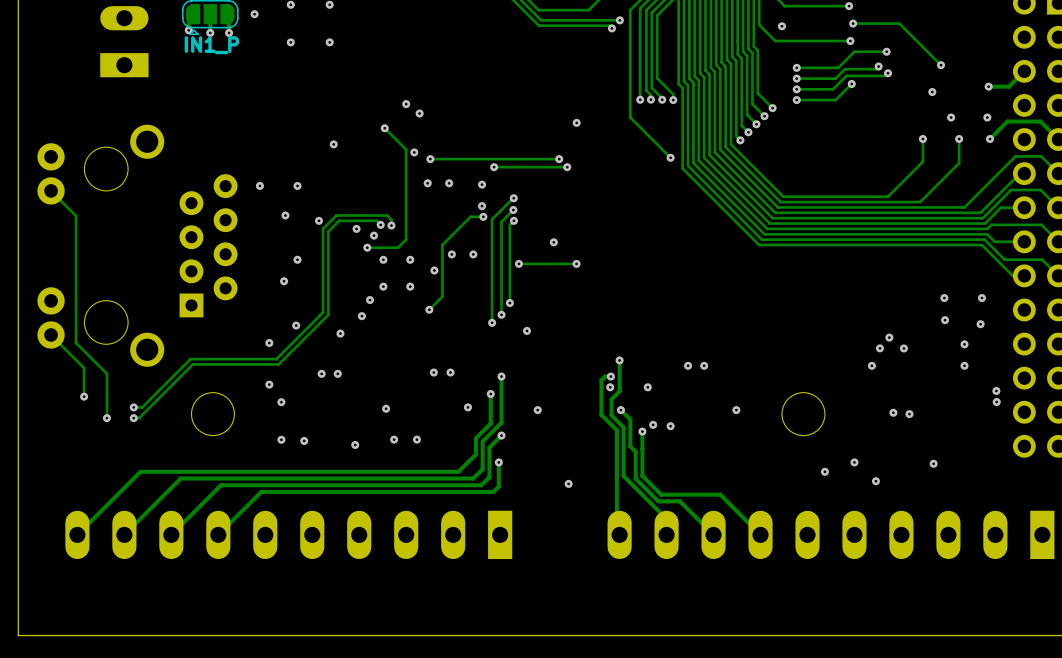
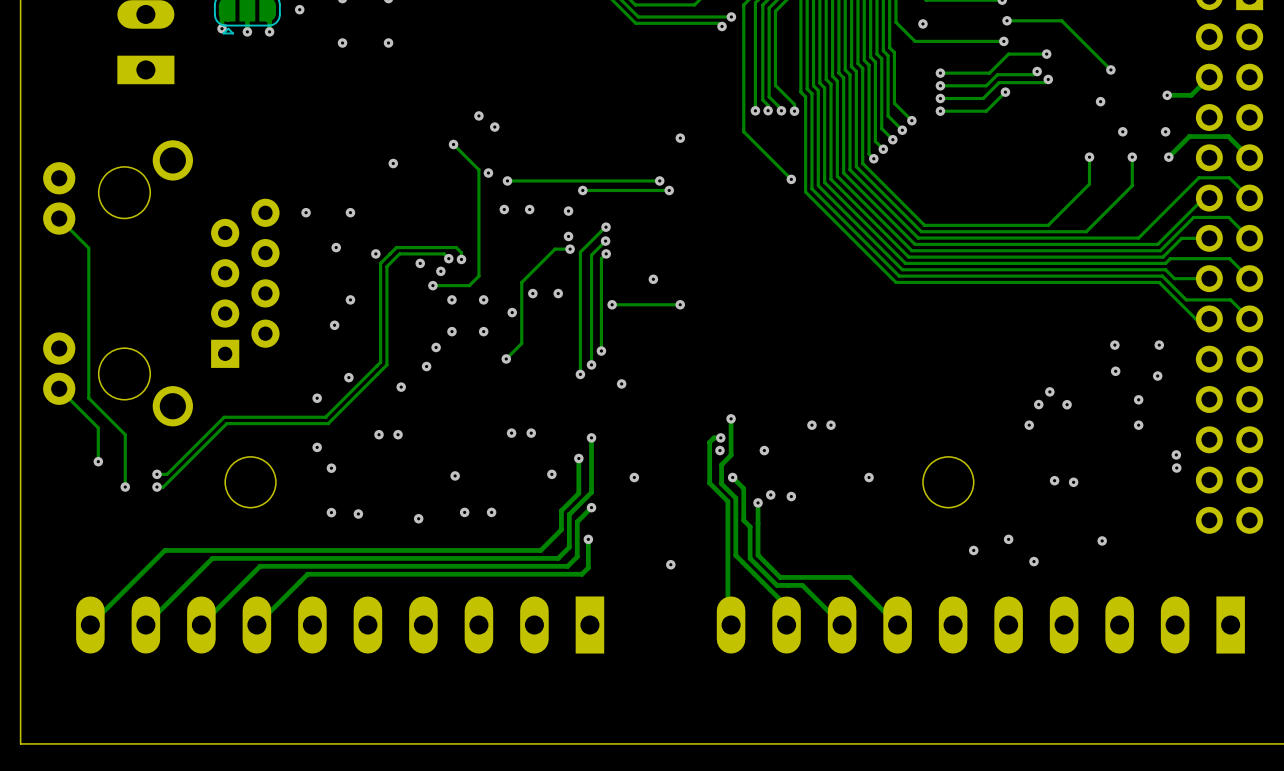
text: IN1_P (211, 45) -> none

